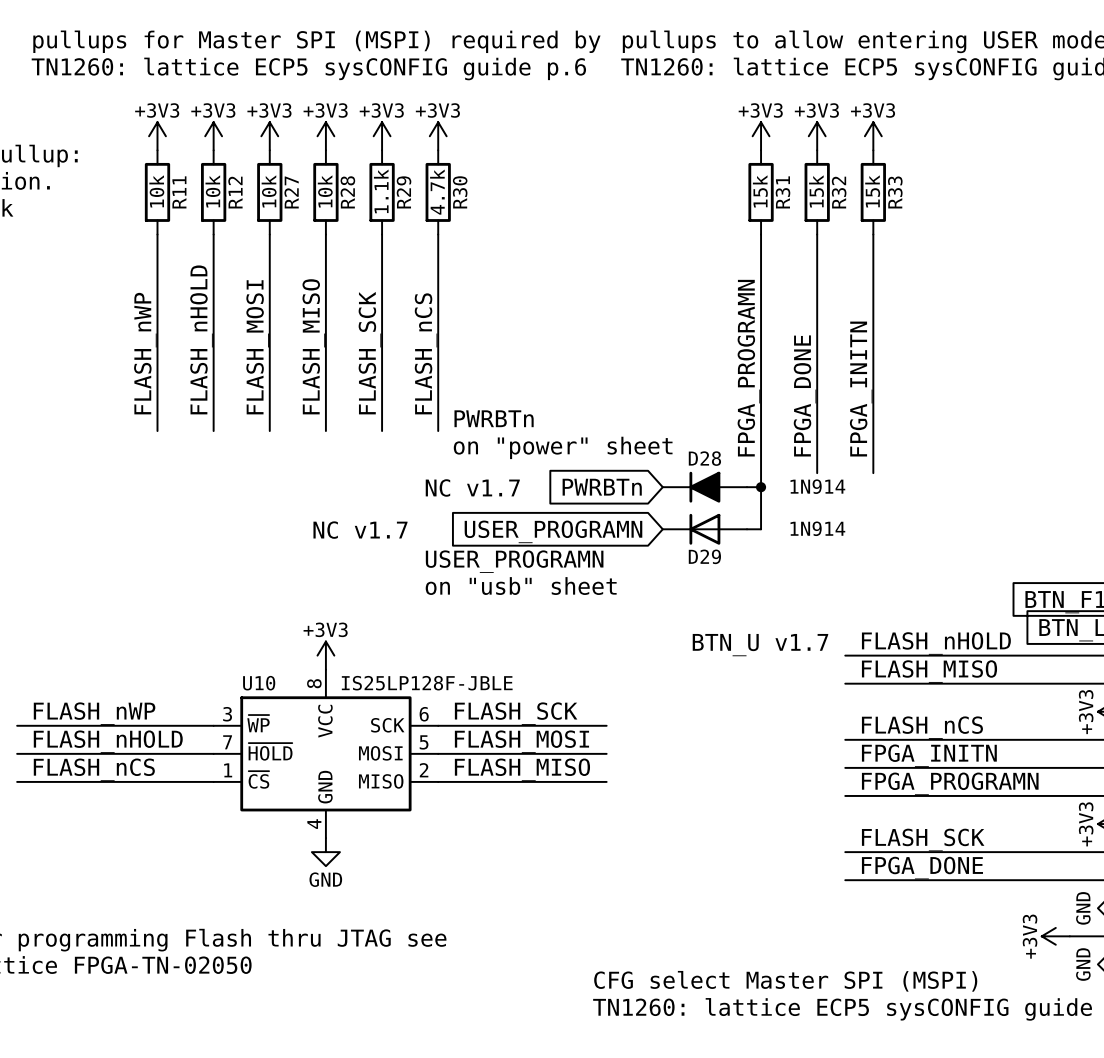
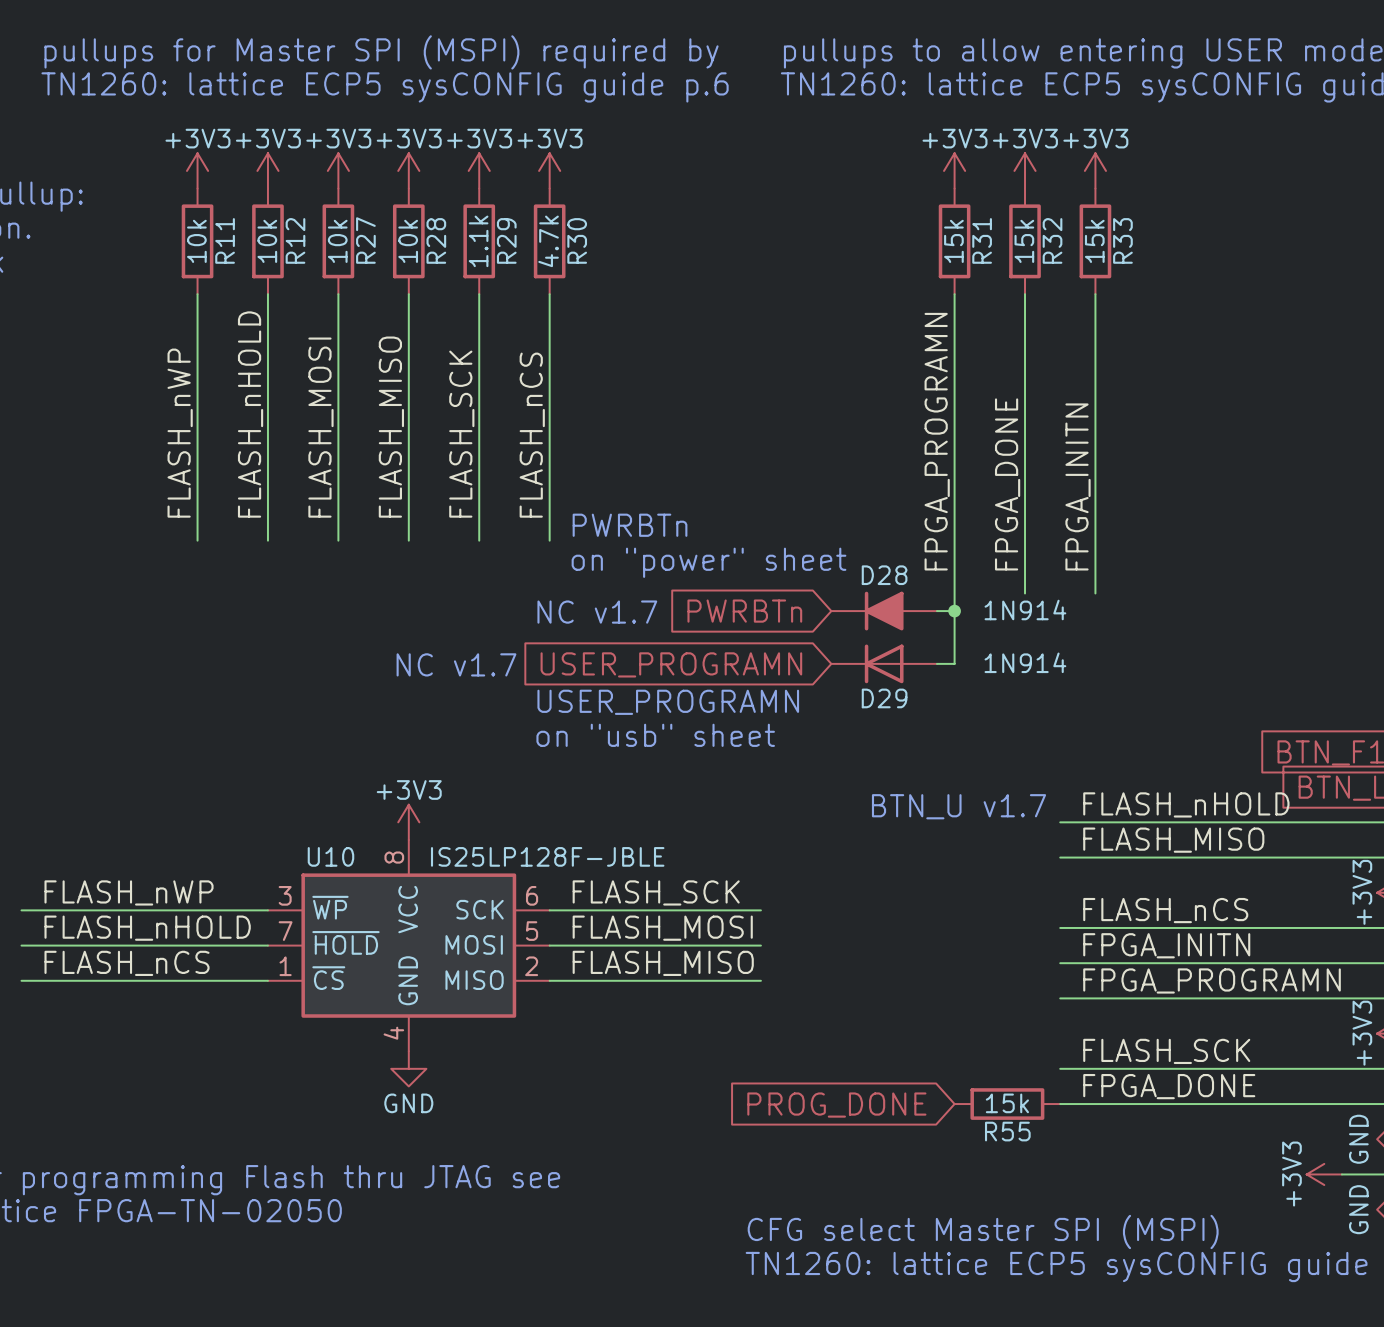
R55: none -> 15k (1007, 1104)
global label: none -> PROG_DONE (836, 1105)

